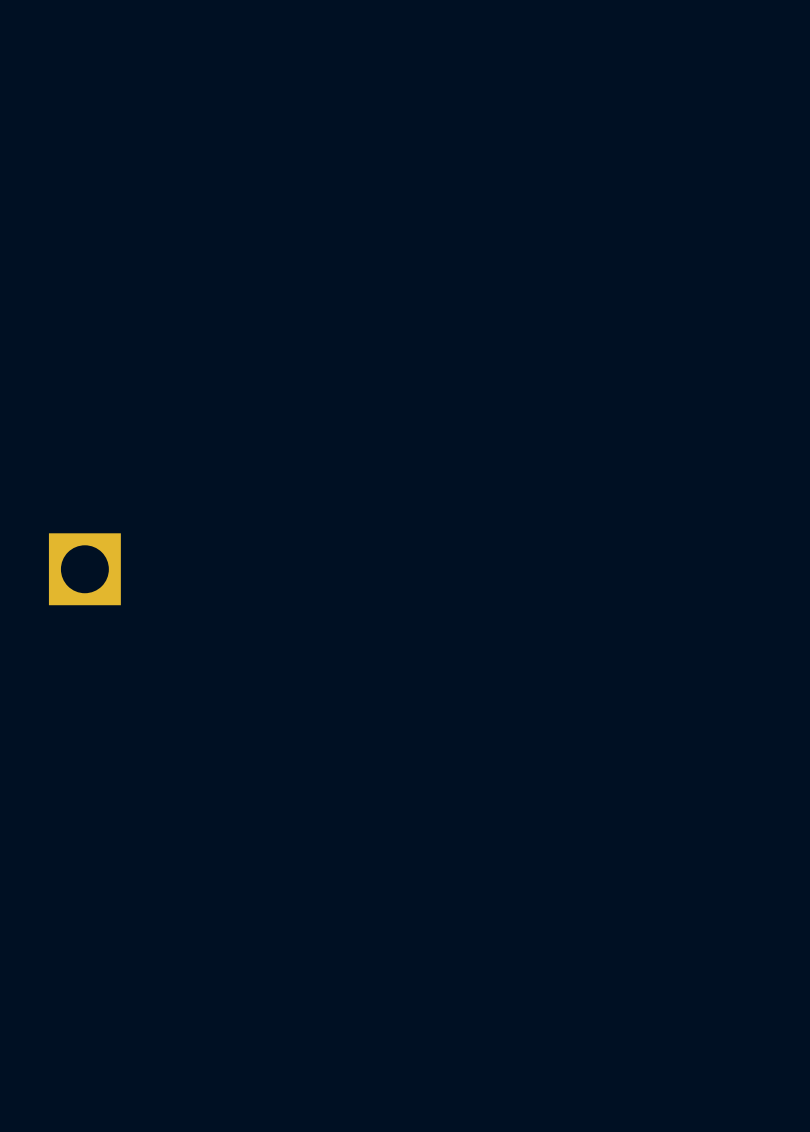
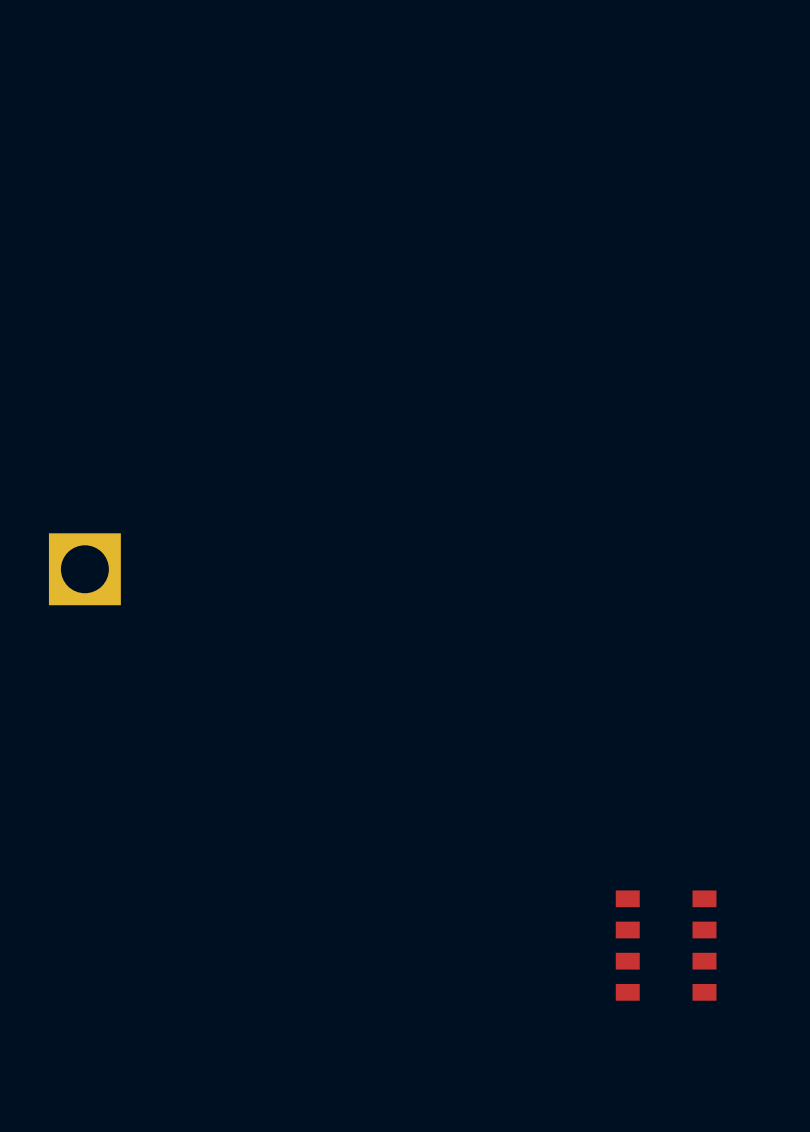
part: none -> (666, 945)

